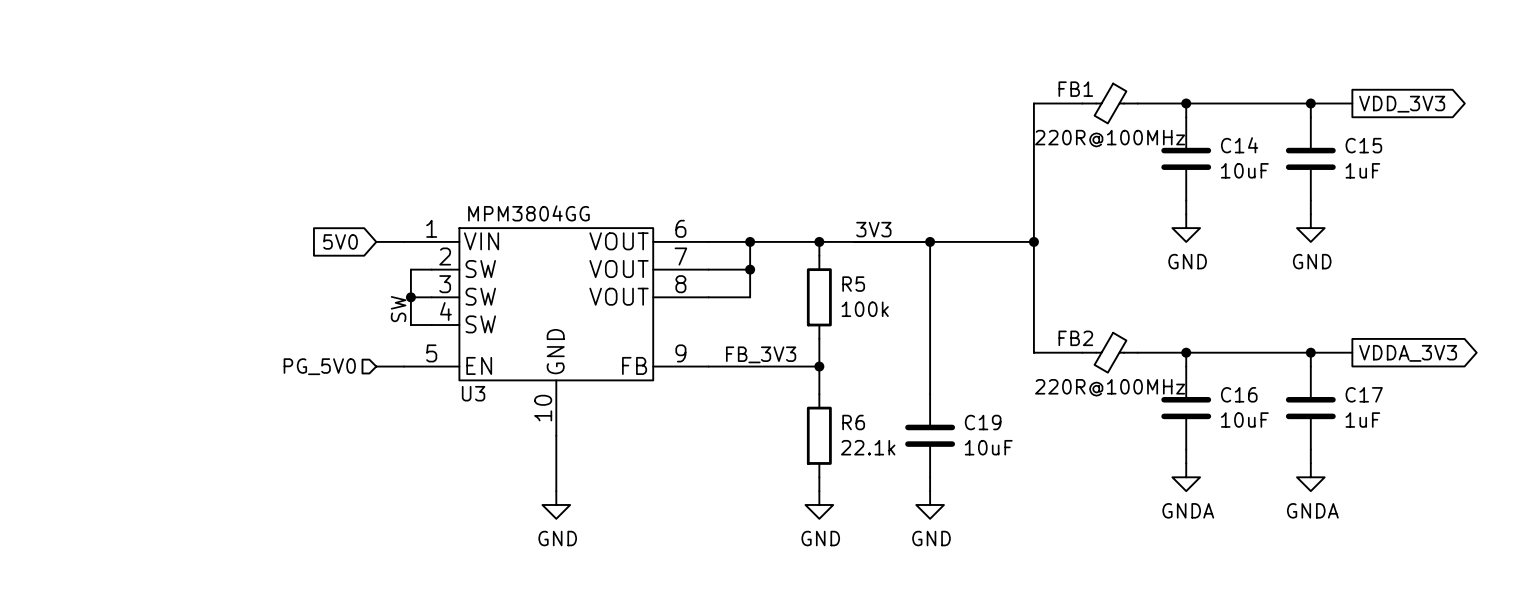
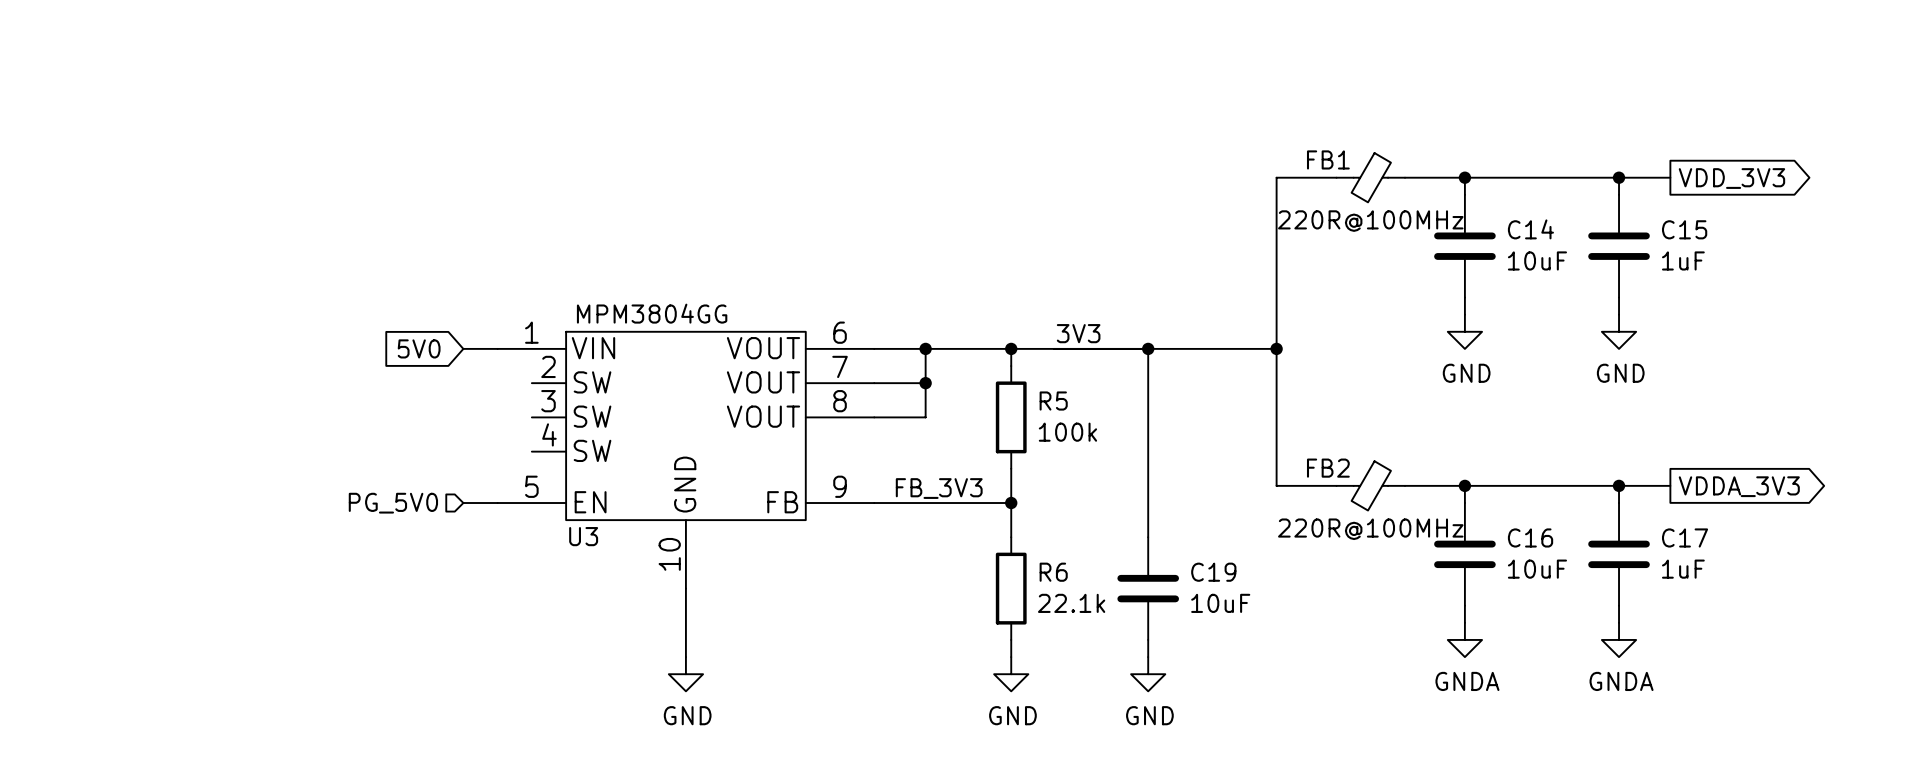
wire: (431, 269) (410, 269) (410, 325) (431, 325) -> none
wire: (410, 297) (431, 297) -> none
junction: (410, 297) -> none
label: SW (398, 309) -> none

